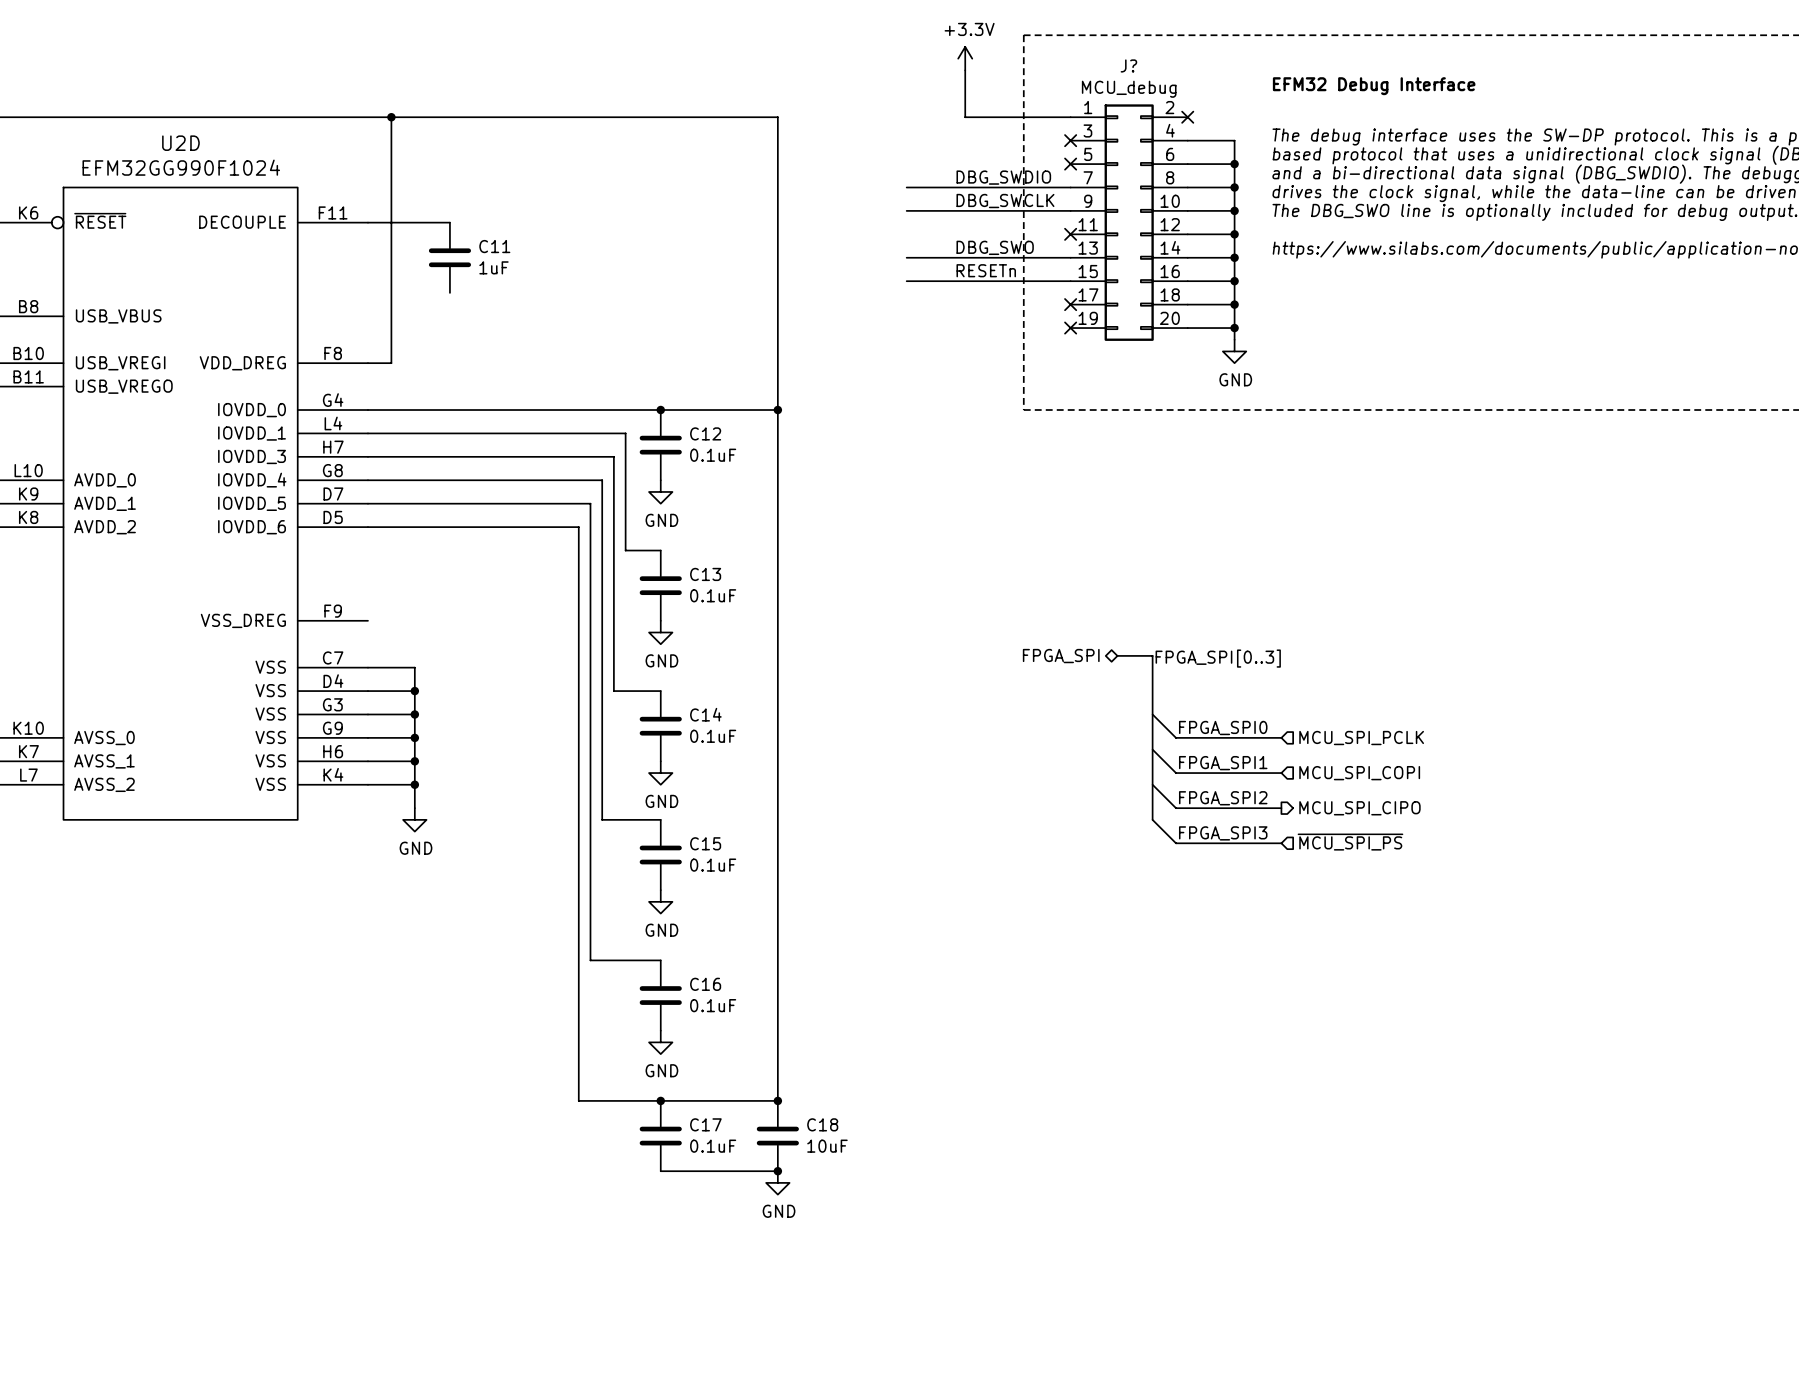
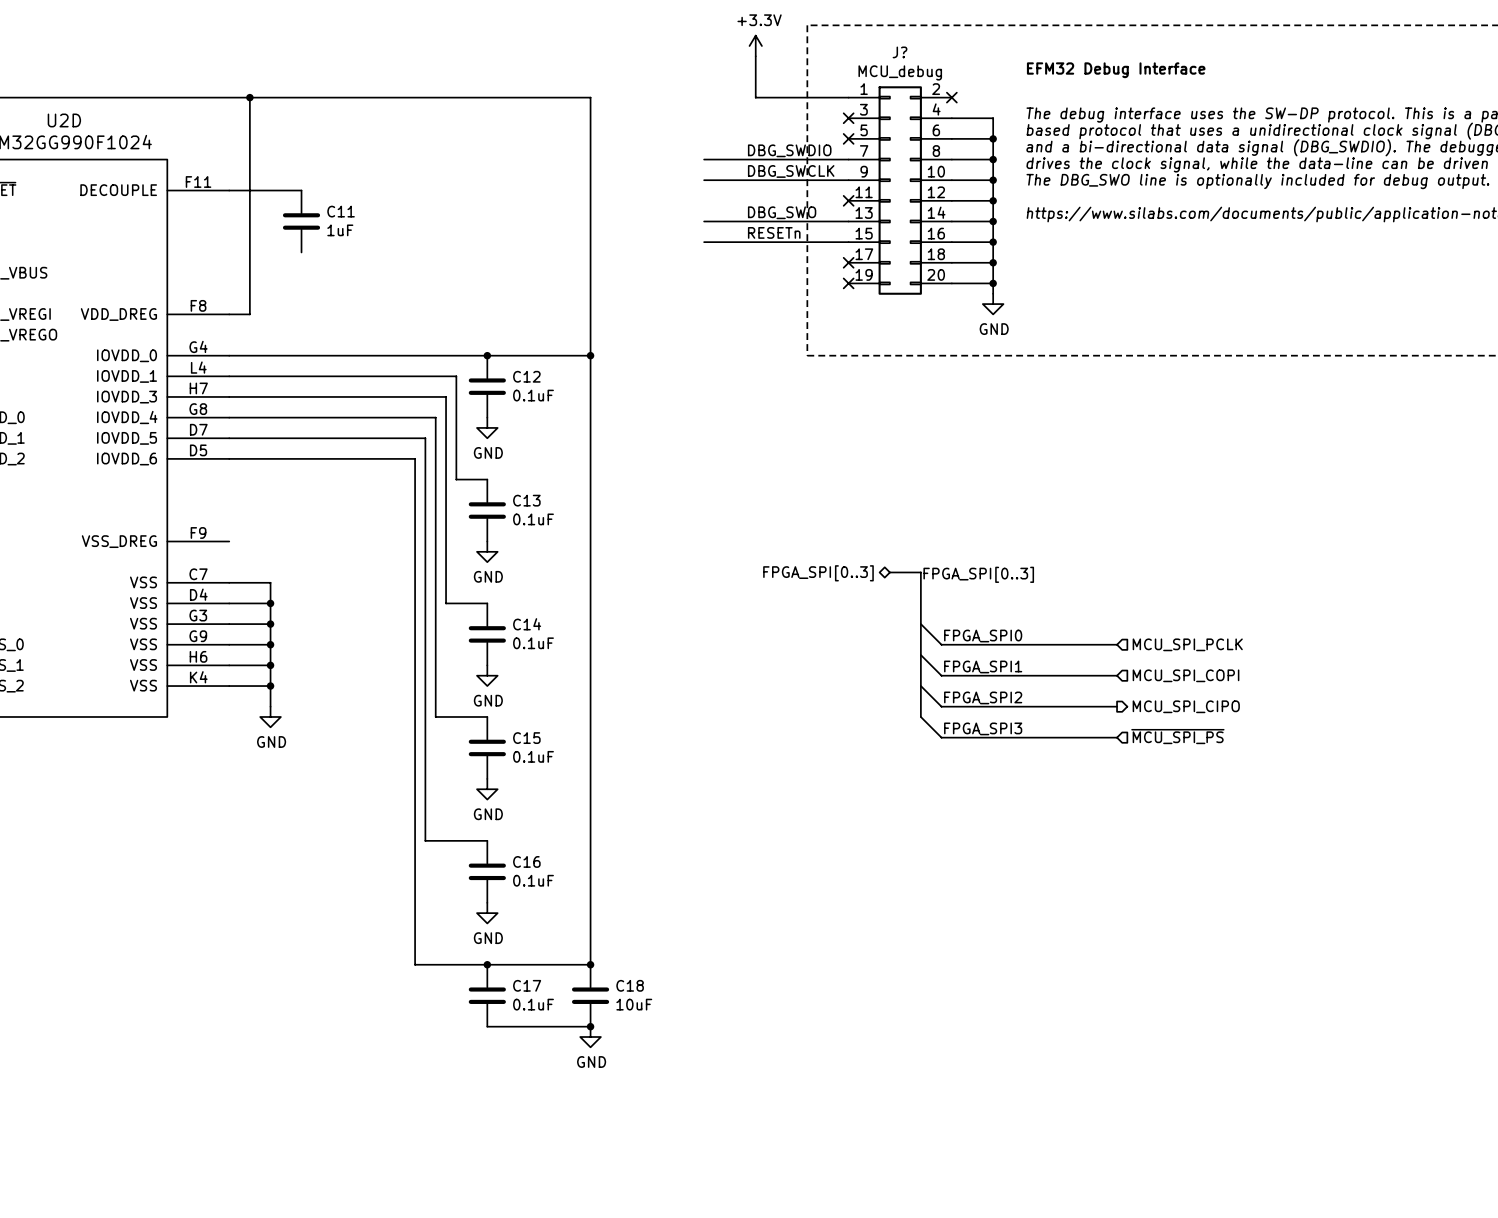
hierarchical label: FPGA_SPI (1061, 656) -> FPGA_SPI[0..3] (818, 573)
wire: none -> (1034, 644) (1117, 644)
hierarchical label position: MCU_SPI_PCLK (1361, 738) -> MCU_SPI_PCLK (1187, 644)
wire: none -> (1034, 675) (1117, 675)
hierarchical label position: MCU_SPI_COPI (1359, 773) -> MCU_SPI_COPI (1186, 675)
wire: none -> (1034, 706) (1117, 706)
hierarchical label position: MCU_SPI_CIPO (1359, 808) -> MCU_SPI_CIPO (1186, 706)
hierarchical label position: ~{MCU_SPI_PS} (1350, 842) -> ~{MCU_SPI_PS} (1177, 736)
wire: none -> (1034, 737) (1117, 737)

